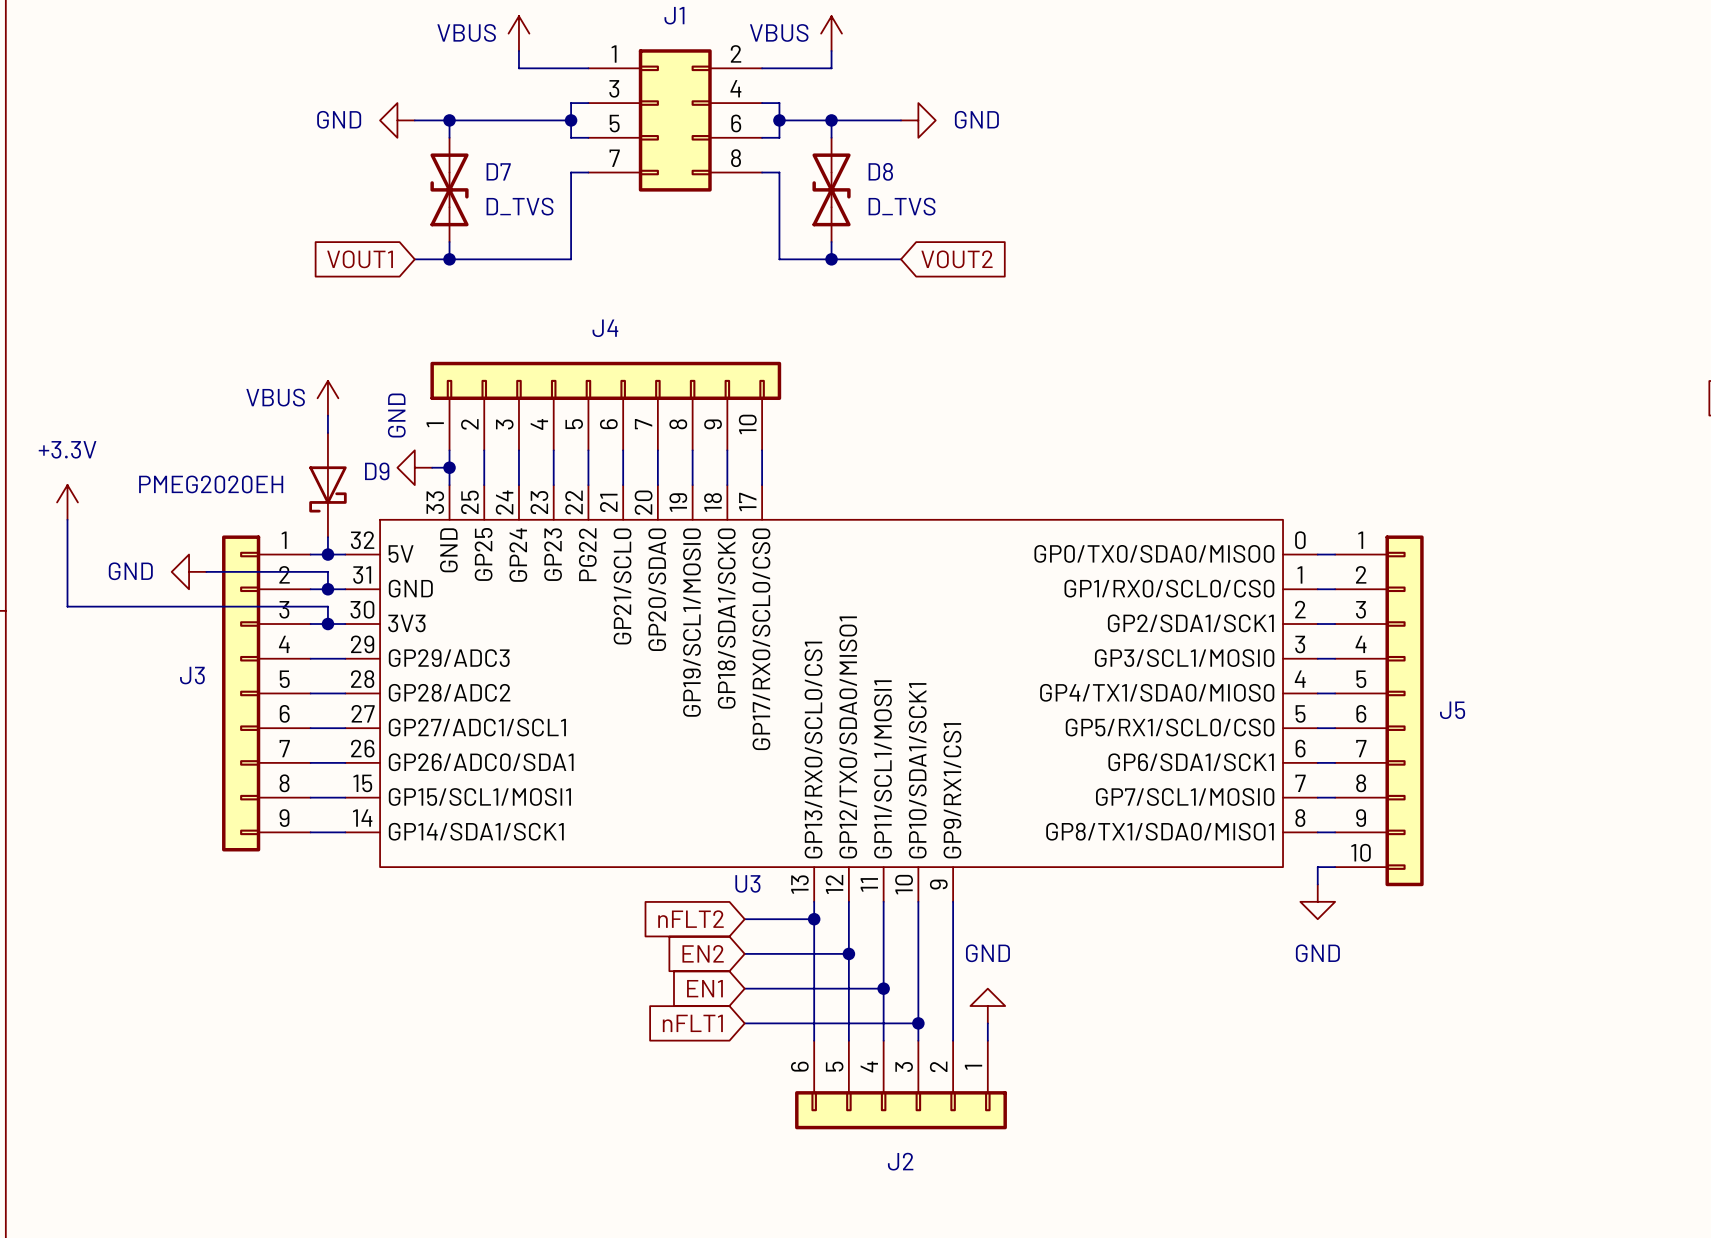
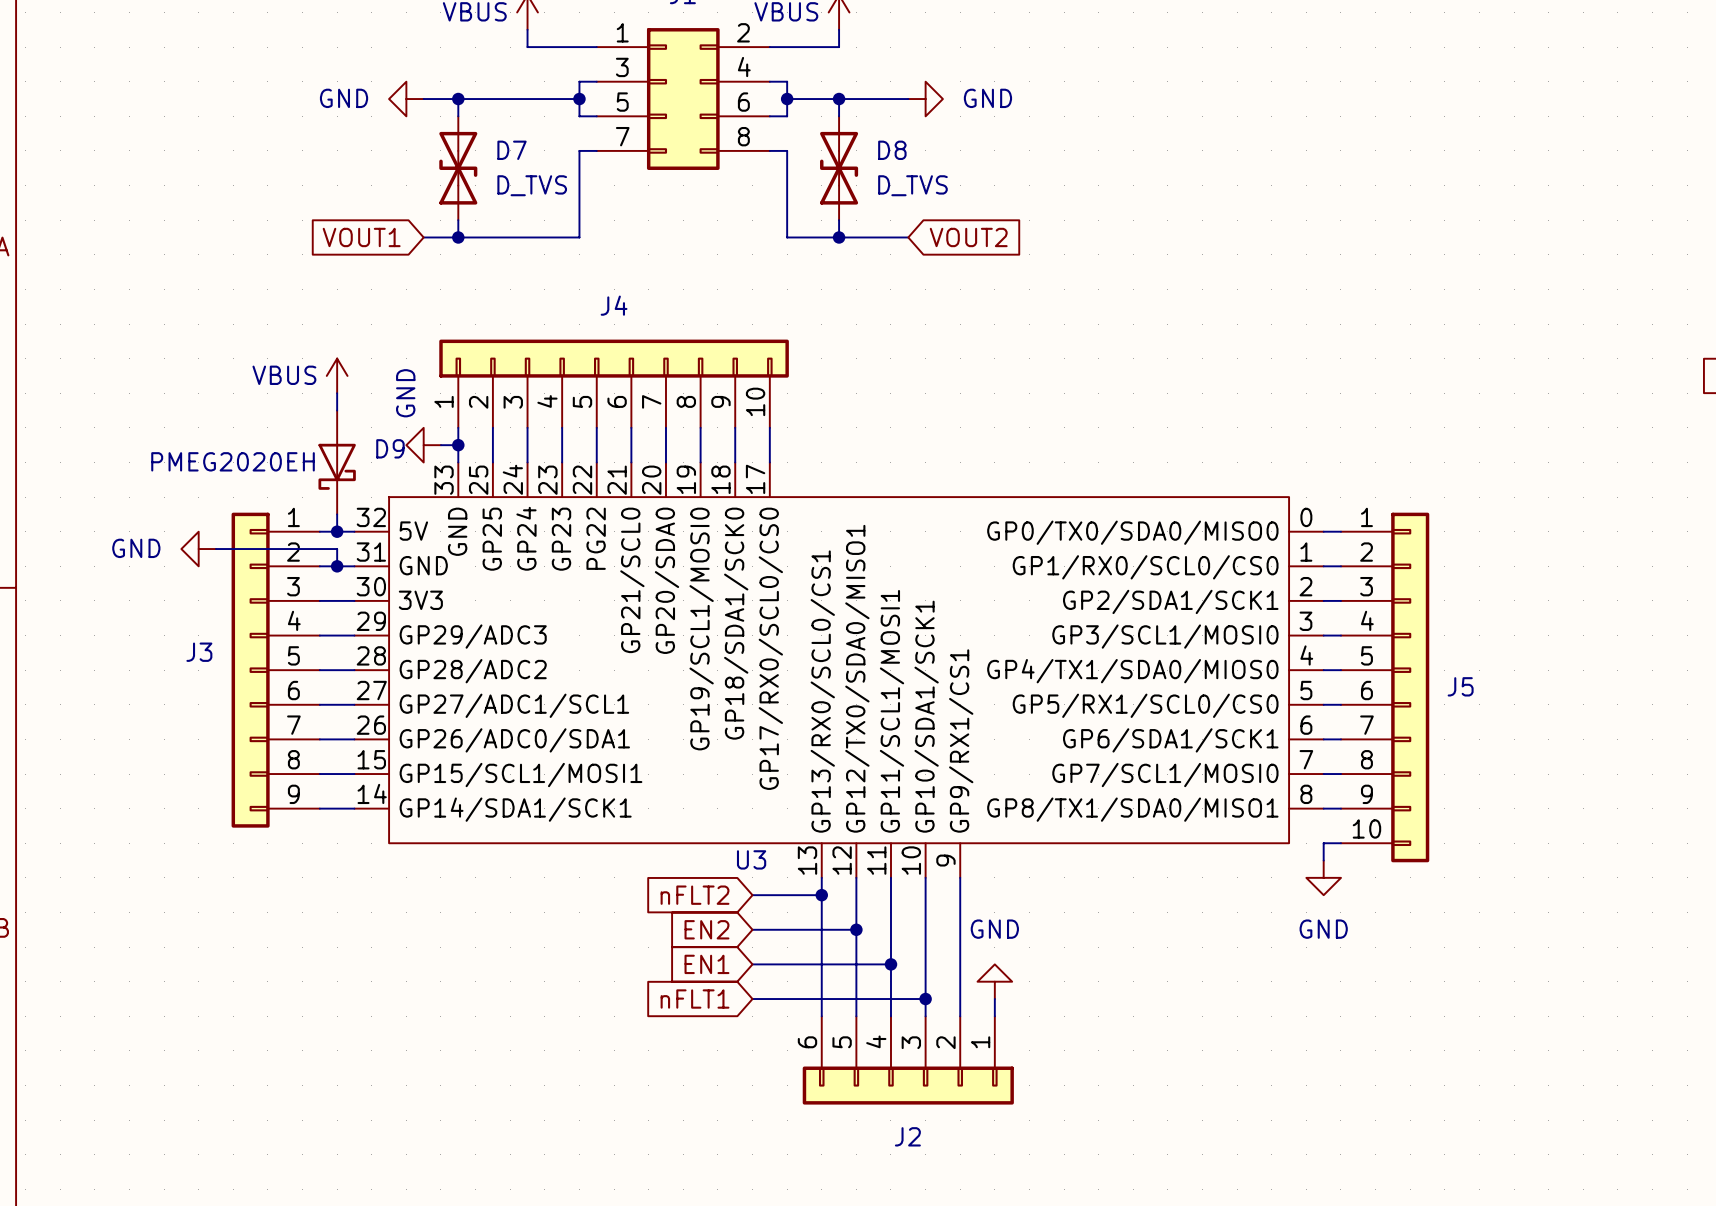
power symbol: +3.3V (67, 502) -> none
wire: (67, 519) (67, 606) (327, 606) (327, 624) -> none
junction: (327, 624) -> none

